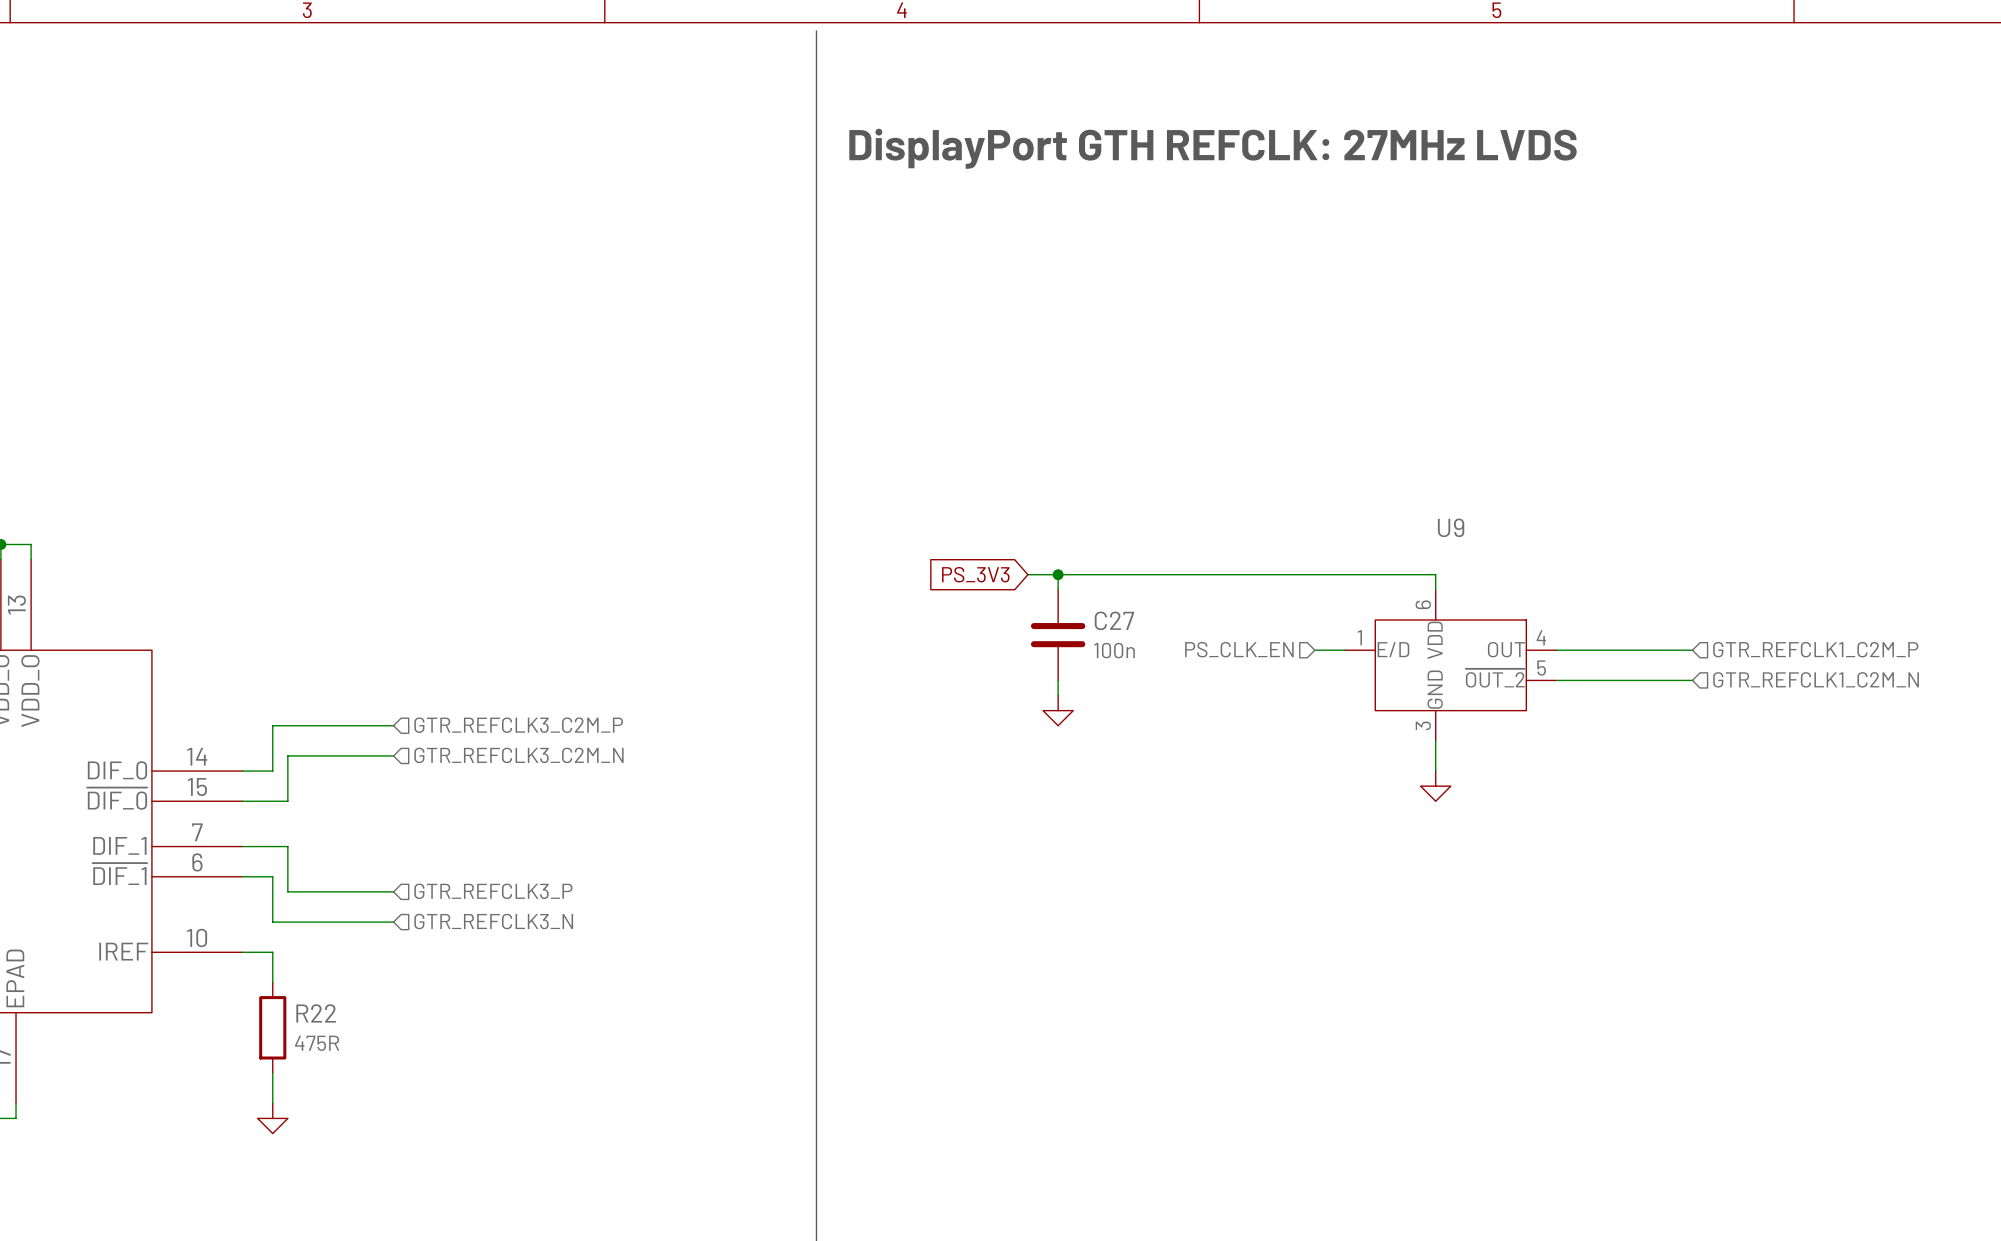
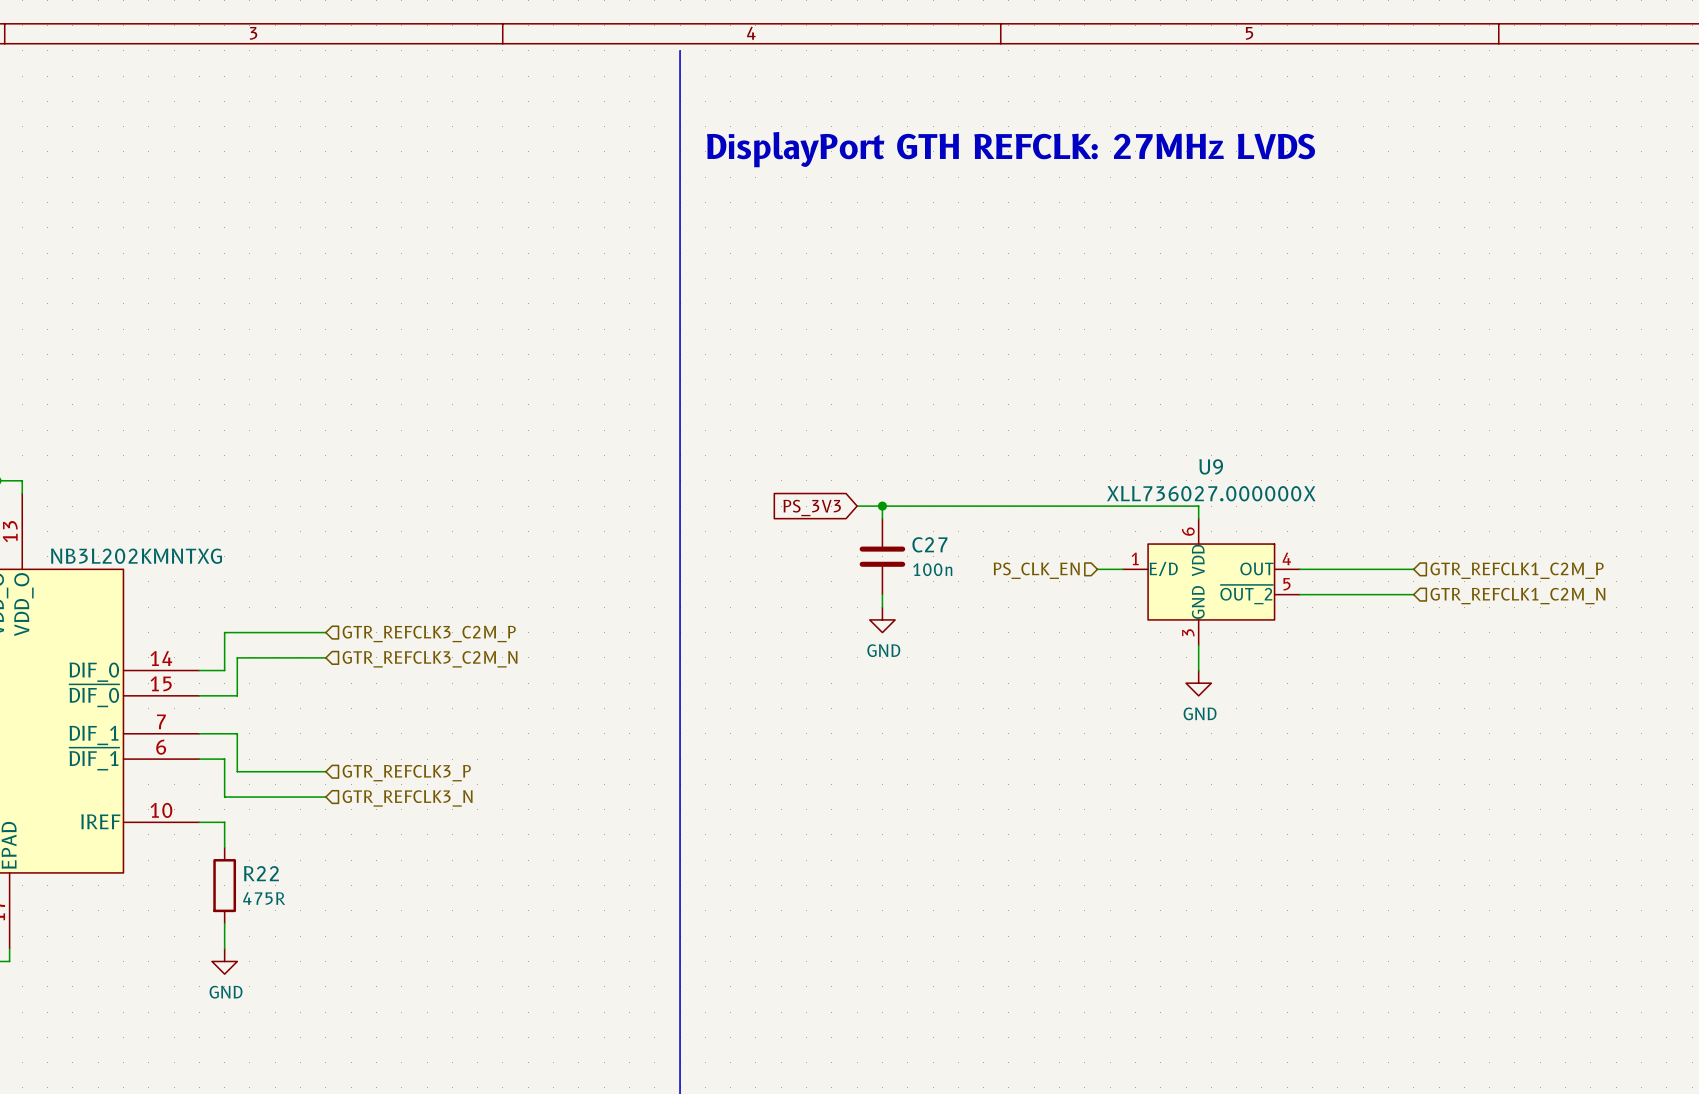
U9 value: none -> XLL736027.000000X (1211, 493)
part value: none -> NB3L202KMNTXG (136, 556)
power symbol text: none -> GND (883, 650)
power symbol text: none -> GND (1200, 713)
power symbol text: none -> GND (226, 992)

